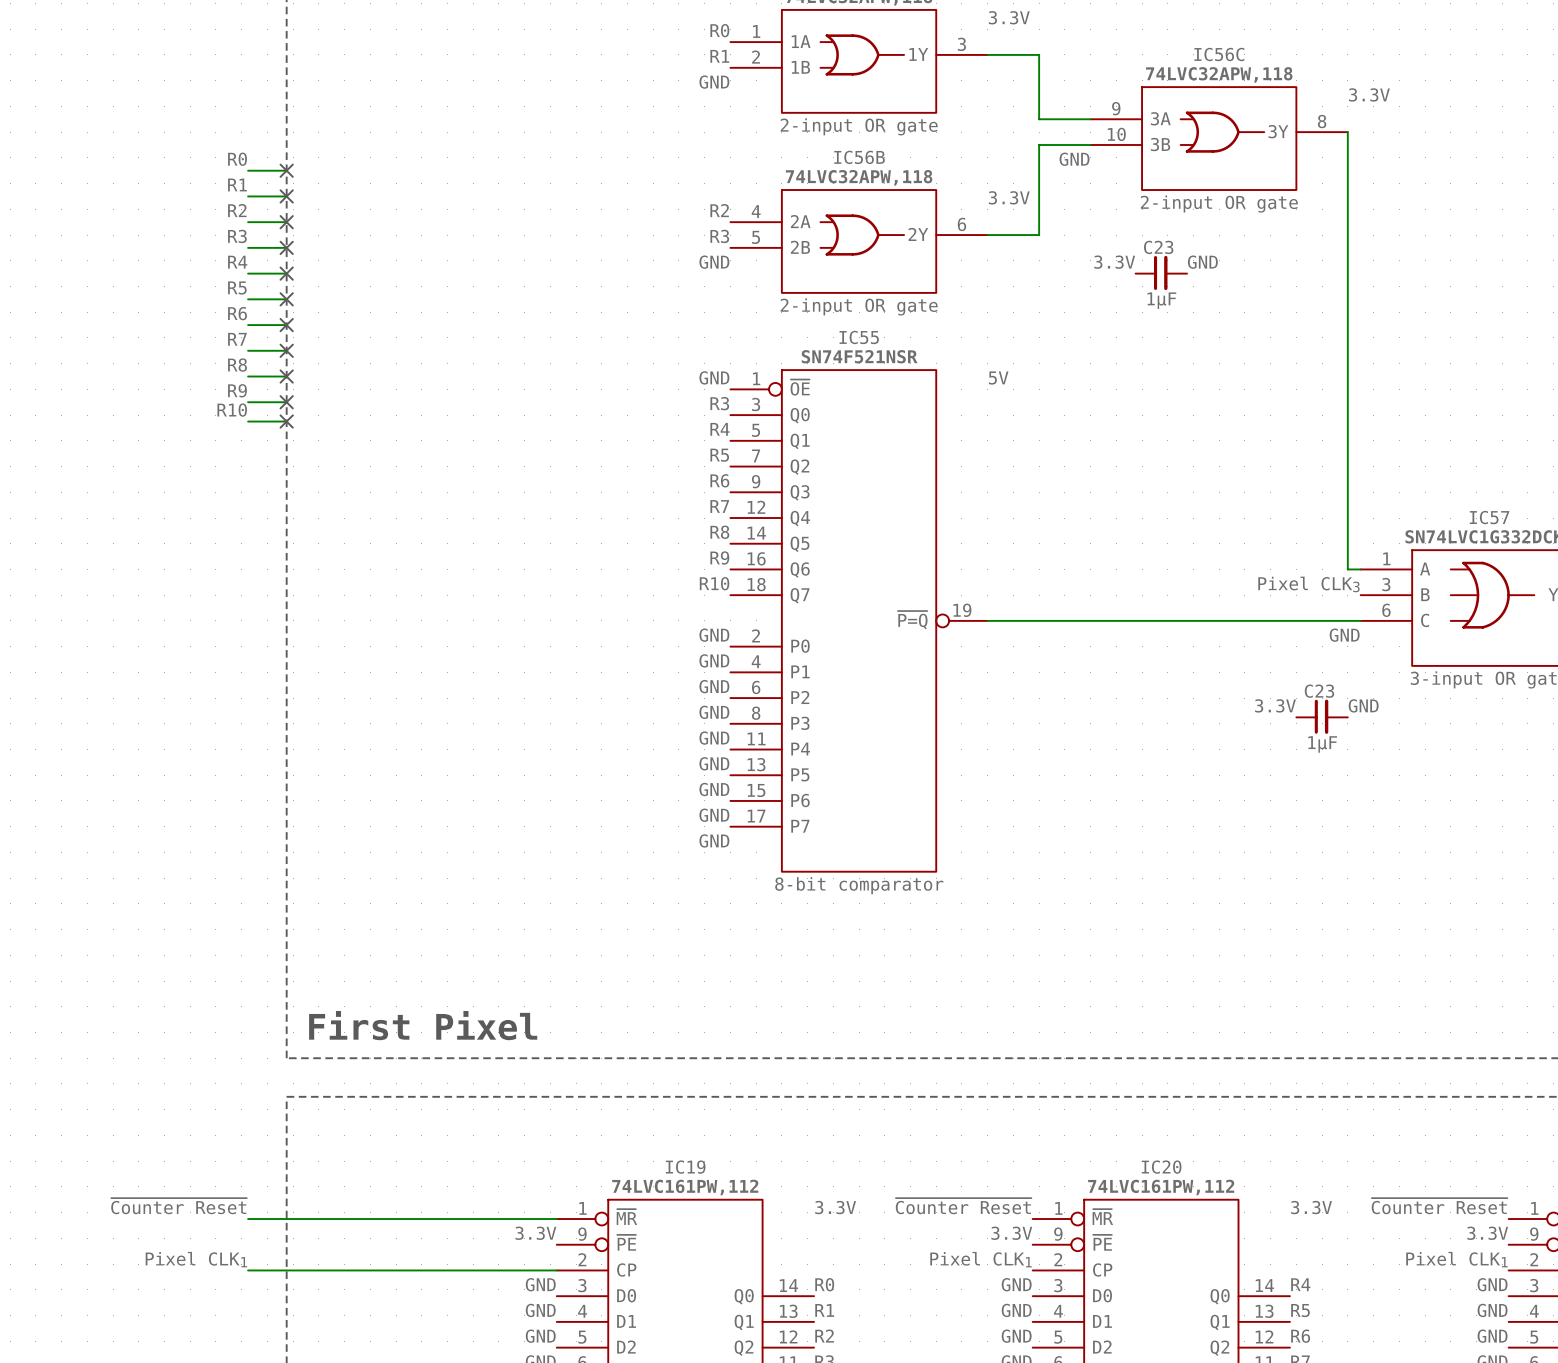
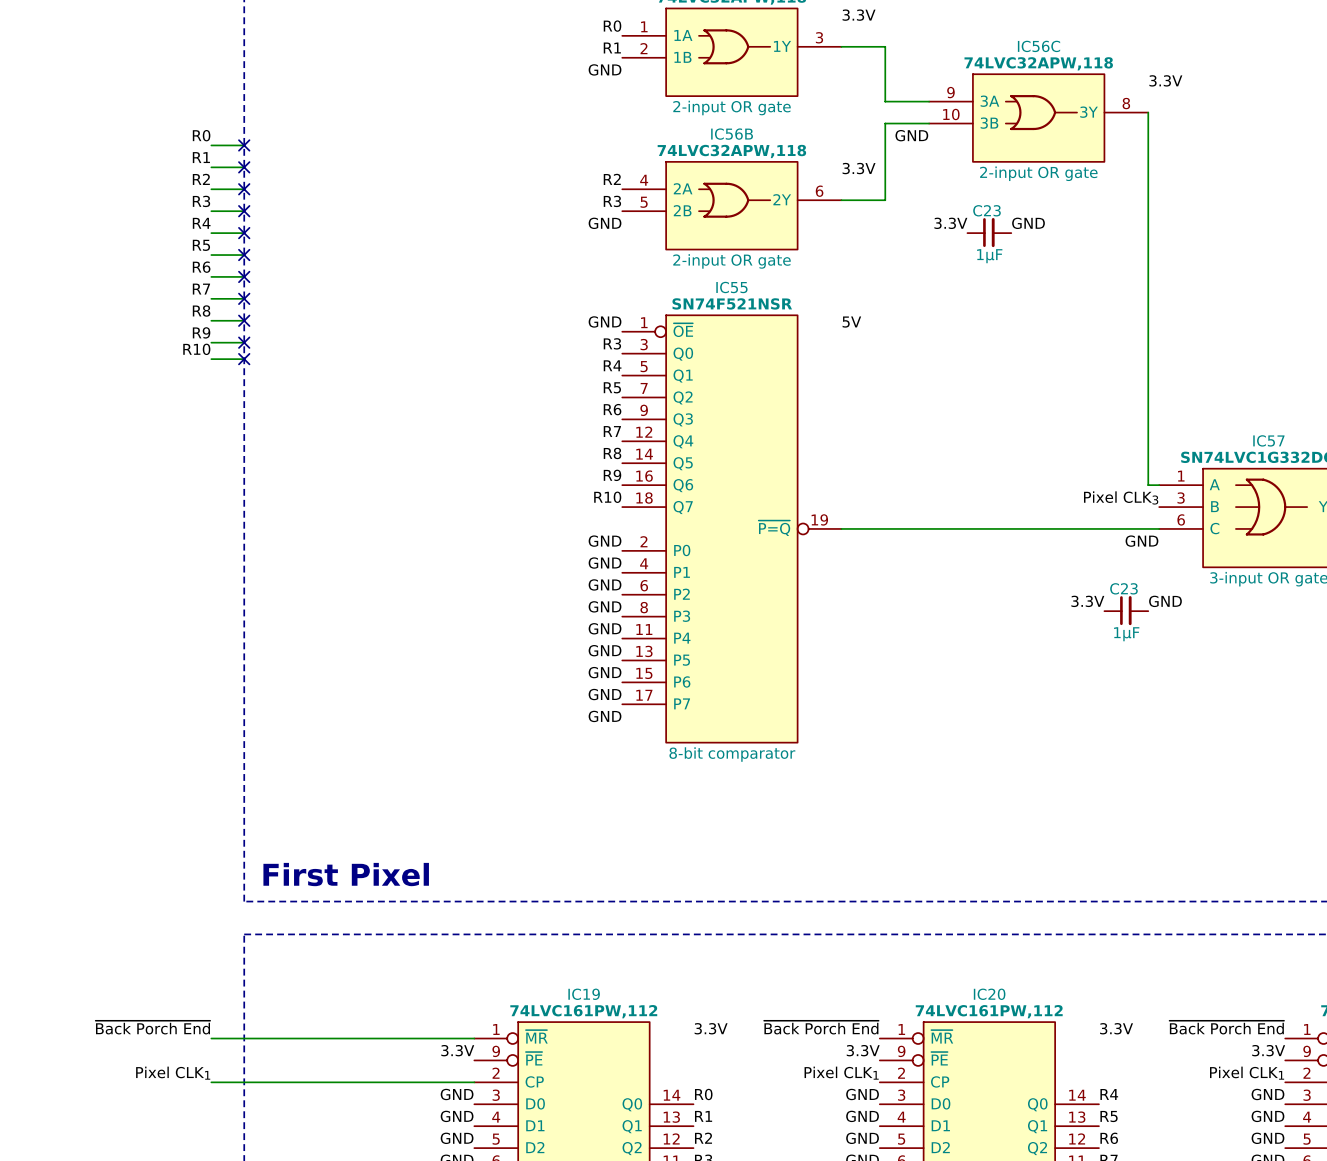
label: ~{Counter Reset} (179, 1206) -> ~{Back Porch End} (152, 1027)
label: ~{Counter Reset} (963, 1206) -> ~{Back Porch End} (821, 1027)
label: ~{Counter Reset} (1439, 1206) -> ~{Back Porch End} (1226, 1027)

